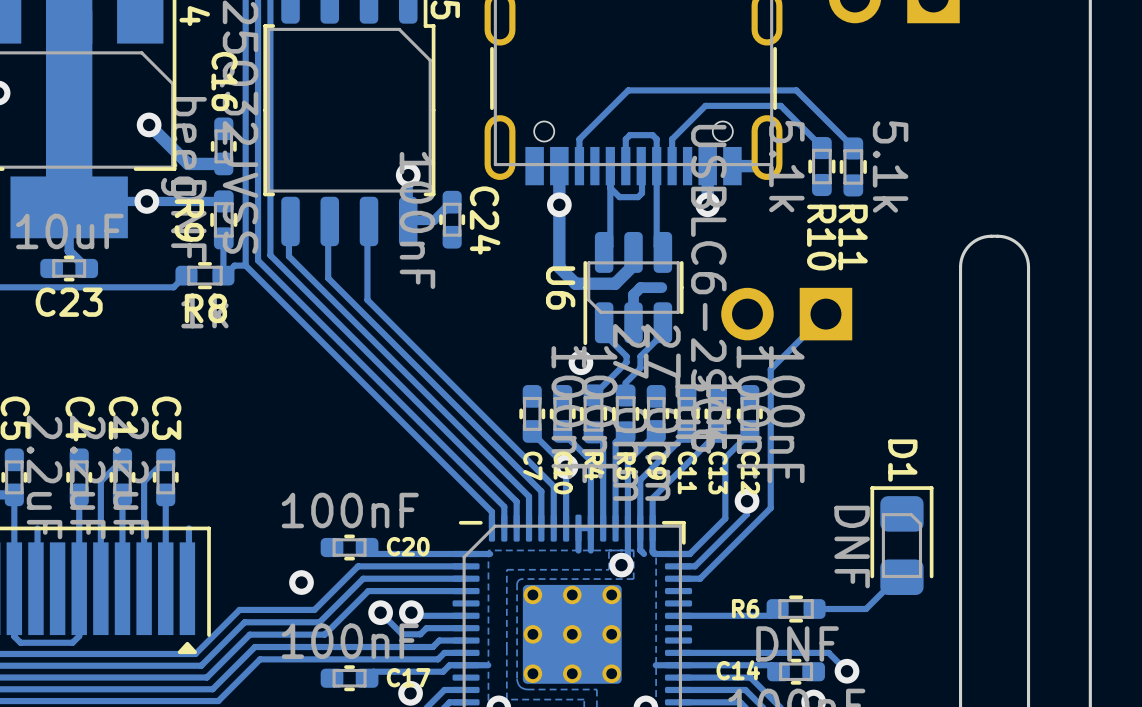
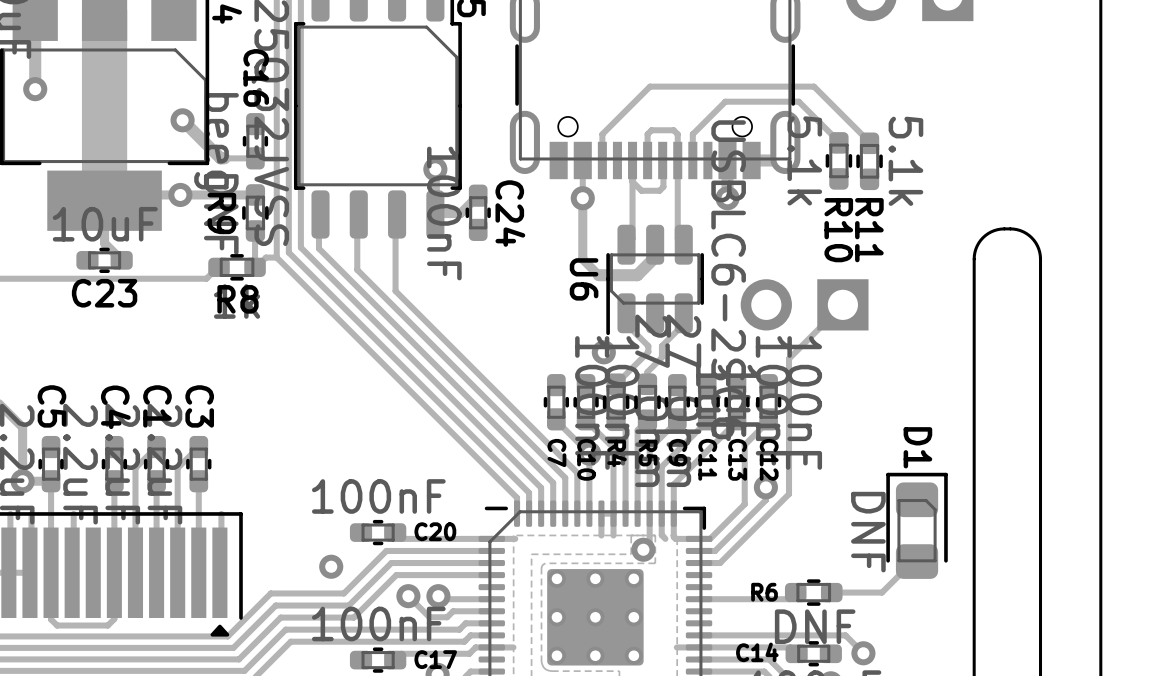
track width: thick (223, 163) (192, 163) -> thin (255, 158) (224, 158)
track width: thick (559, 166) (559, 267) (575, 283) -> thin (582, 160) (582, 259) (598, 275)
track: (661, 287) (640, 287) (633, 294) (633, 322) -> none

